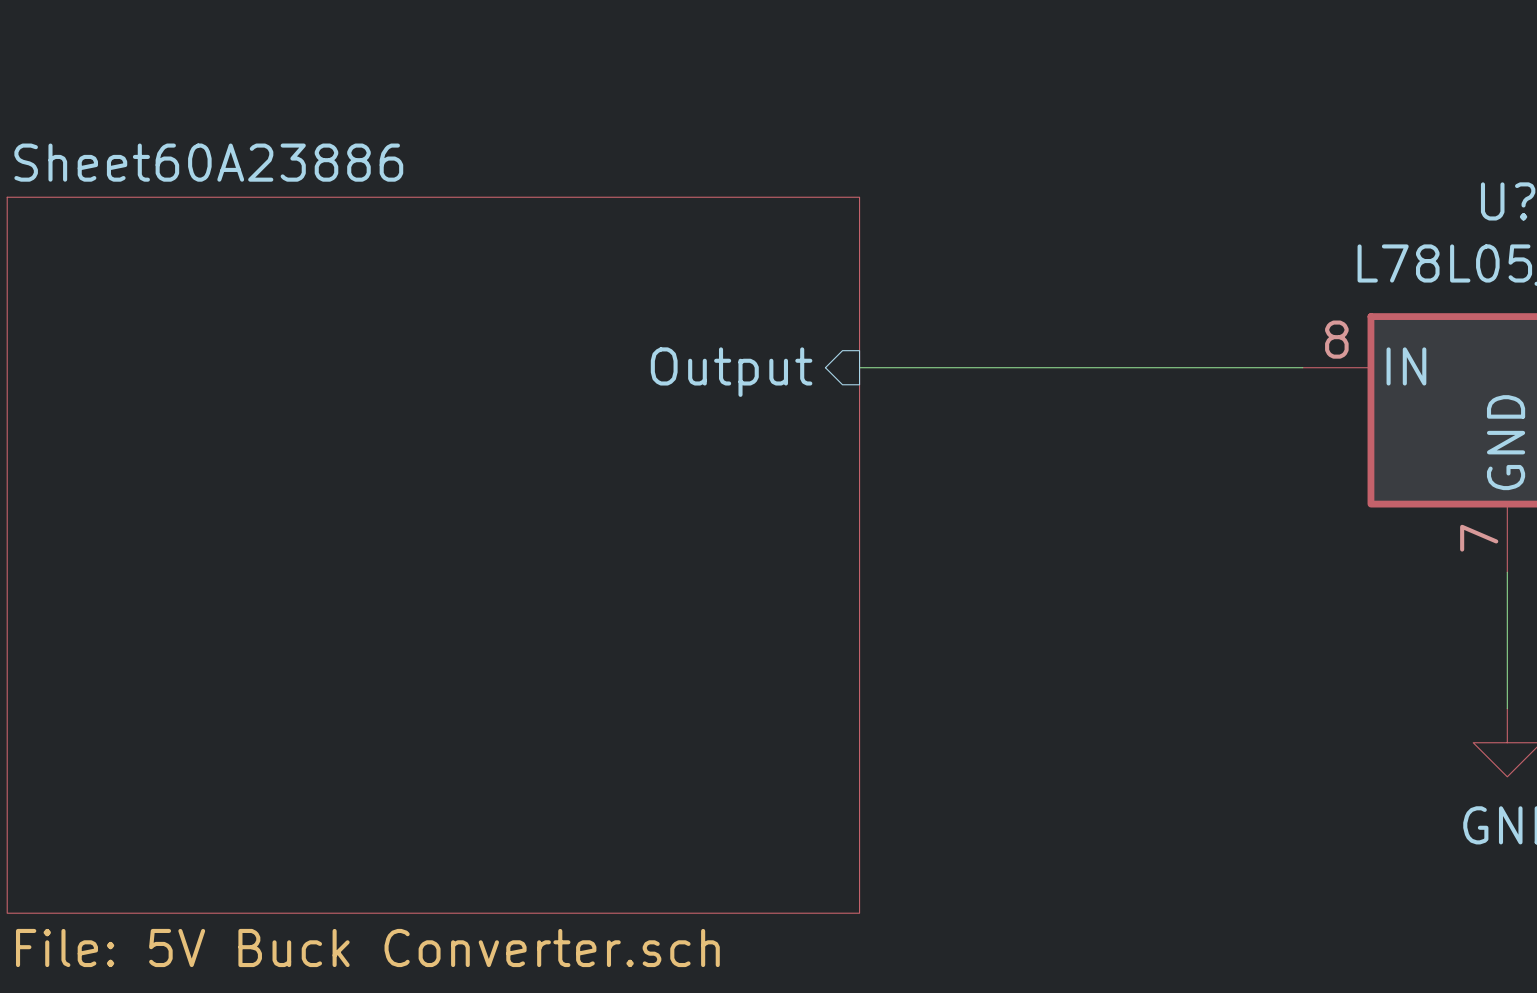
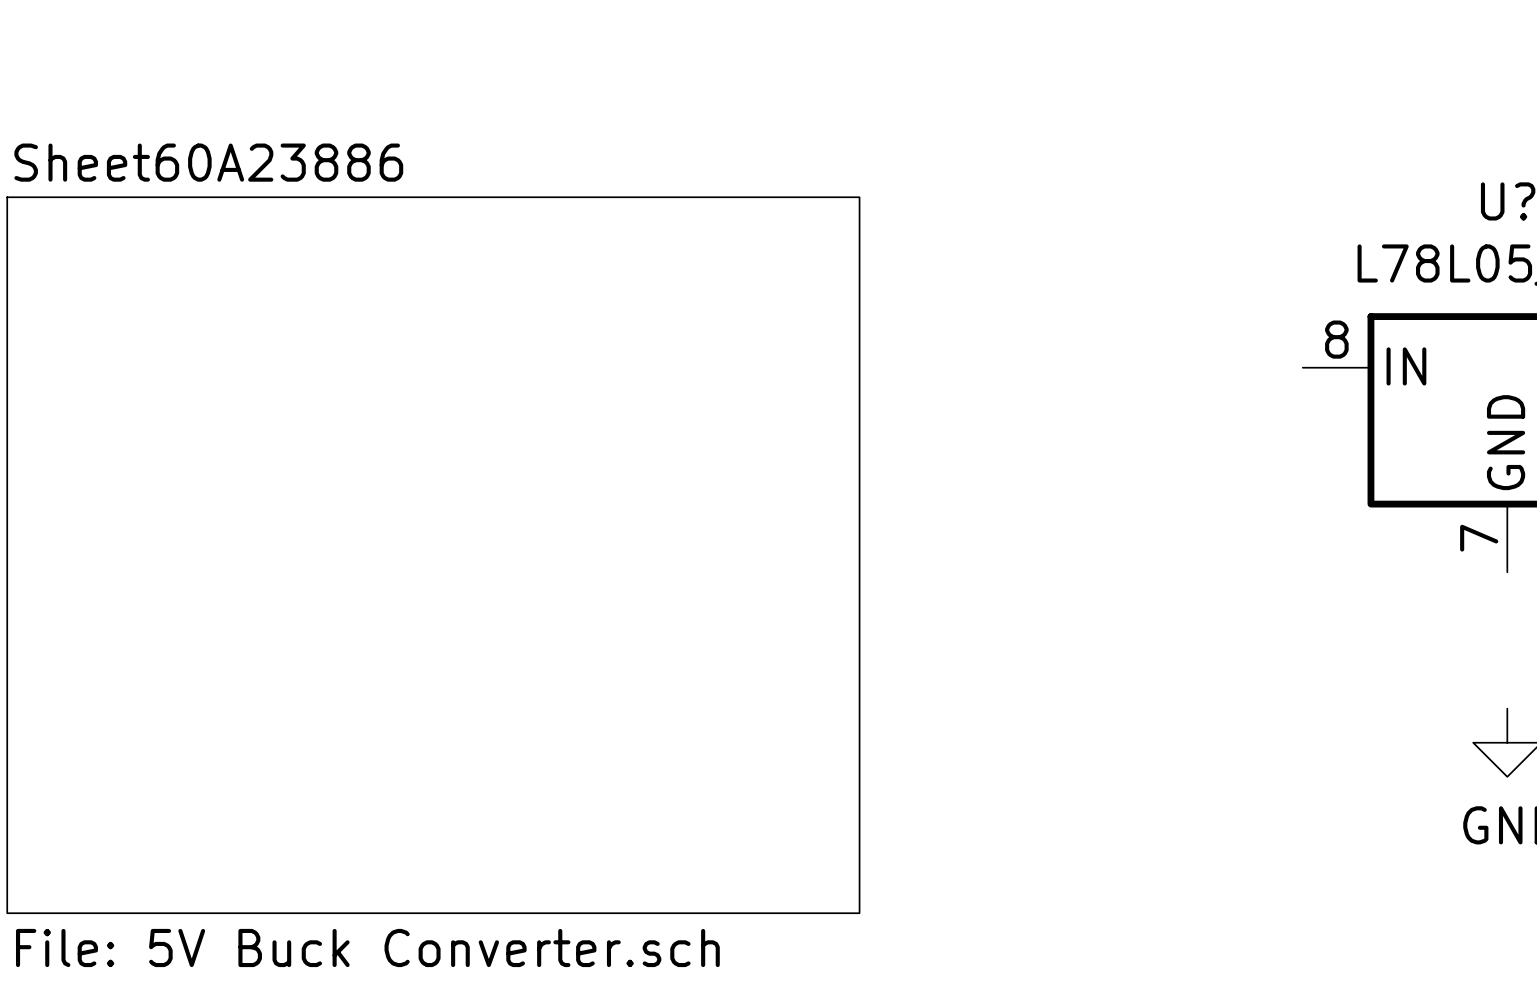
wire: (859, 367) (1302, 367) -> none
sheet pin: Output (731, 372) -> none
wire: (1507, 572) (1507, 708) -> none

